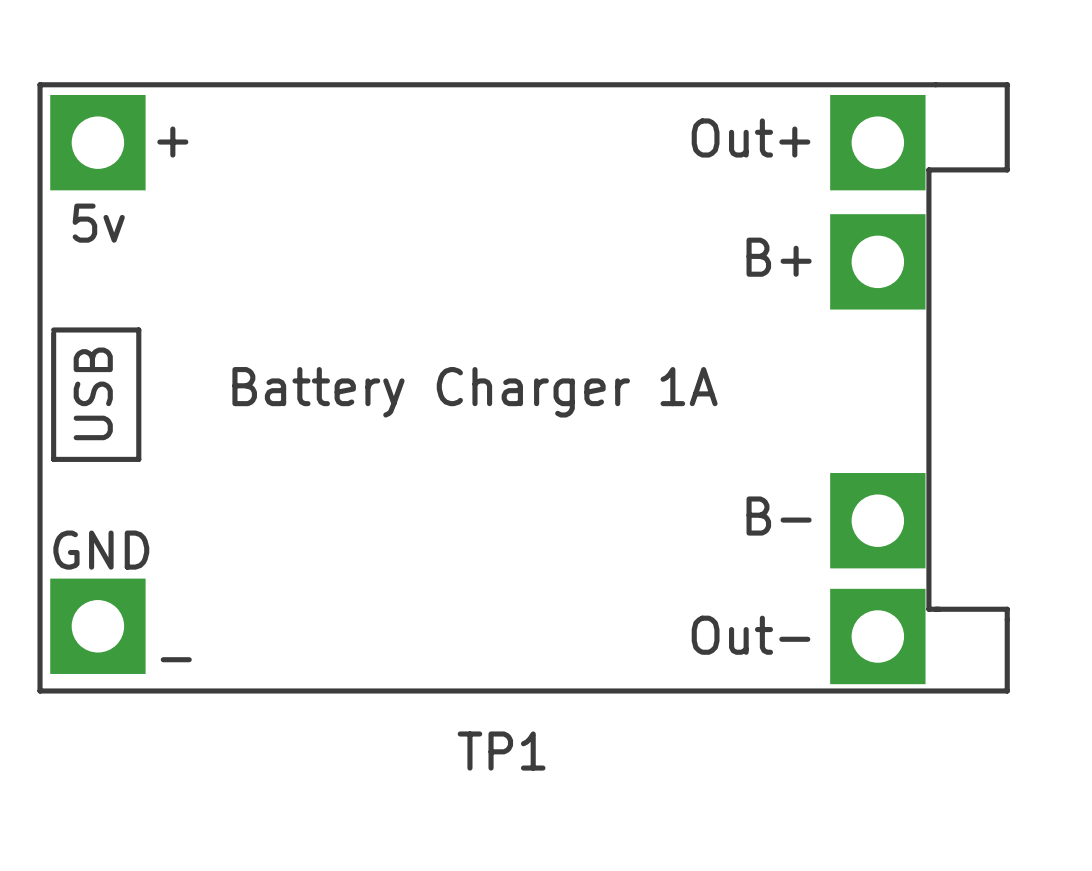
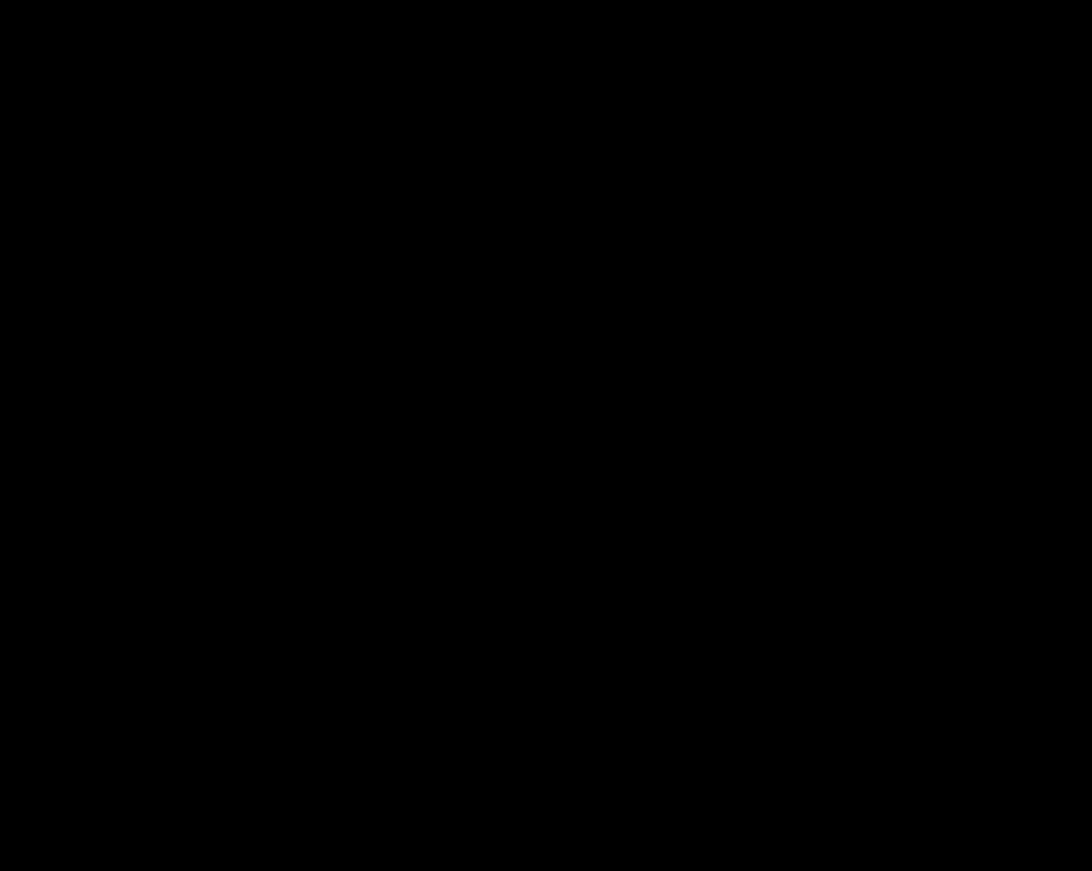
TP1: (523, 387) -> none

